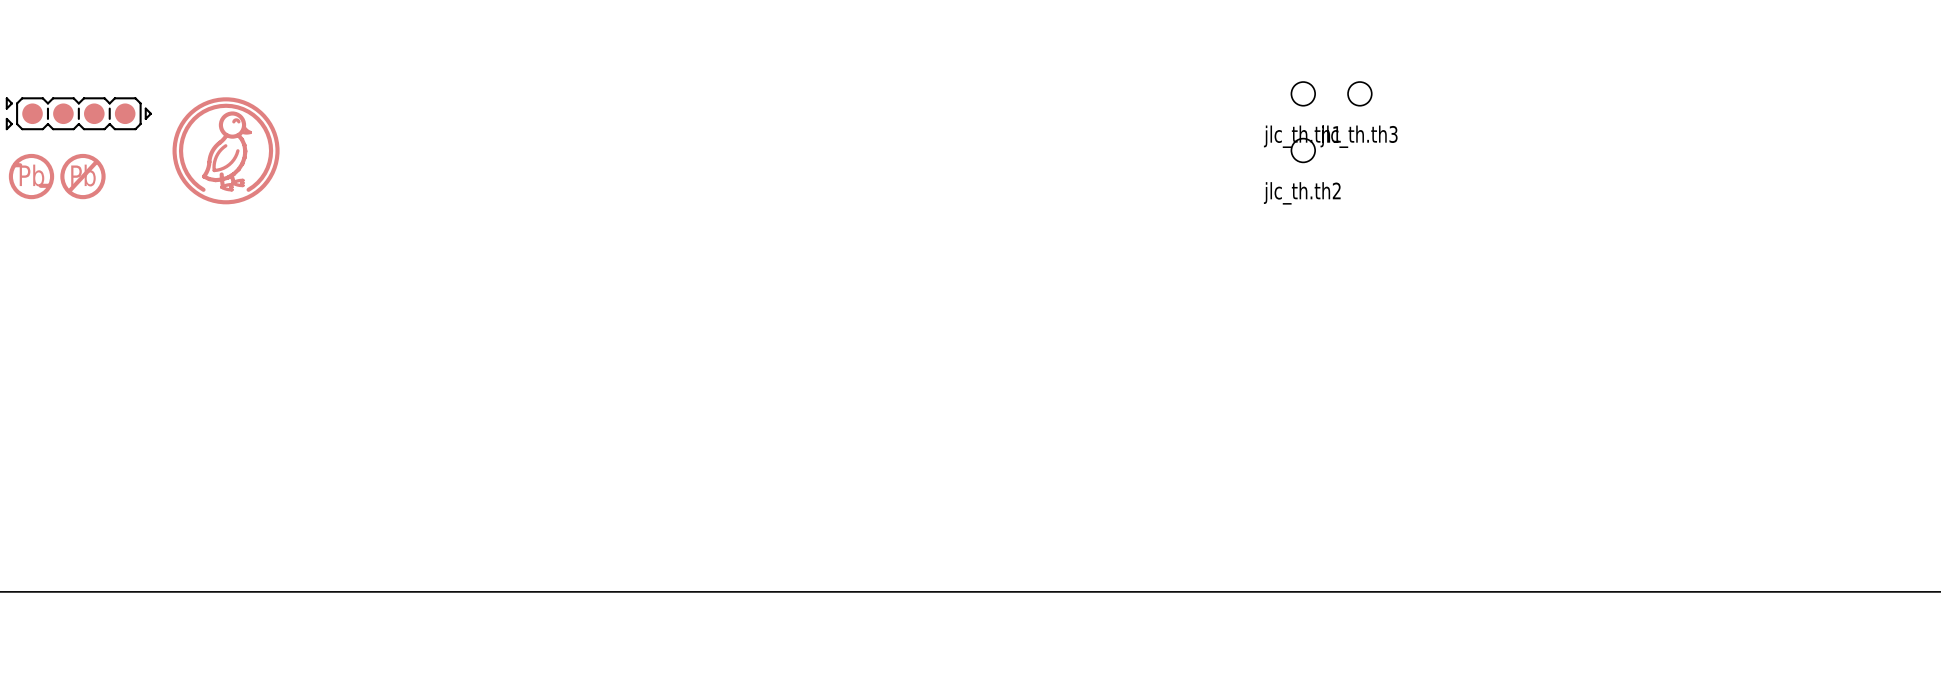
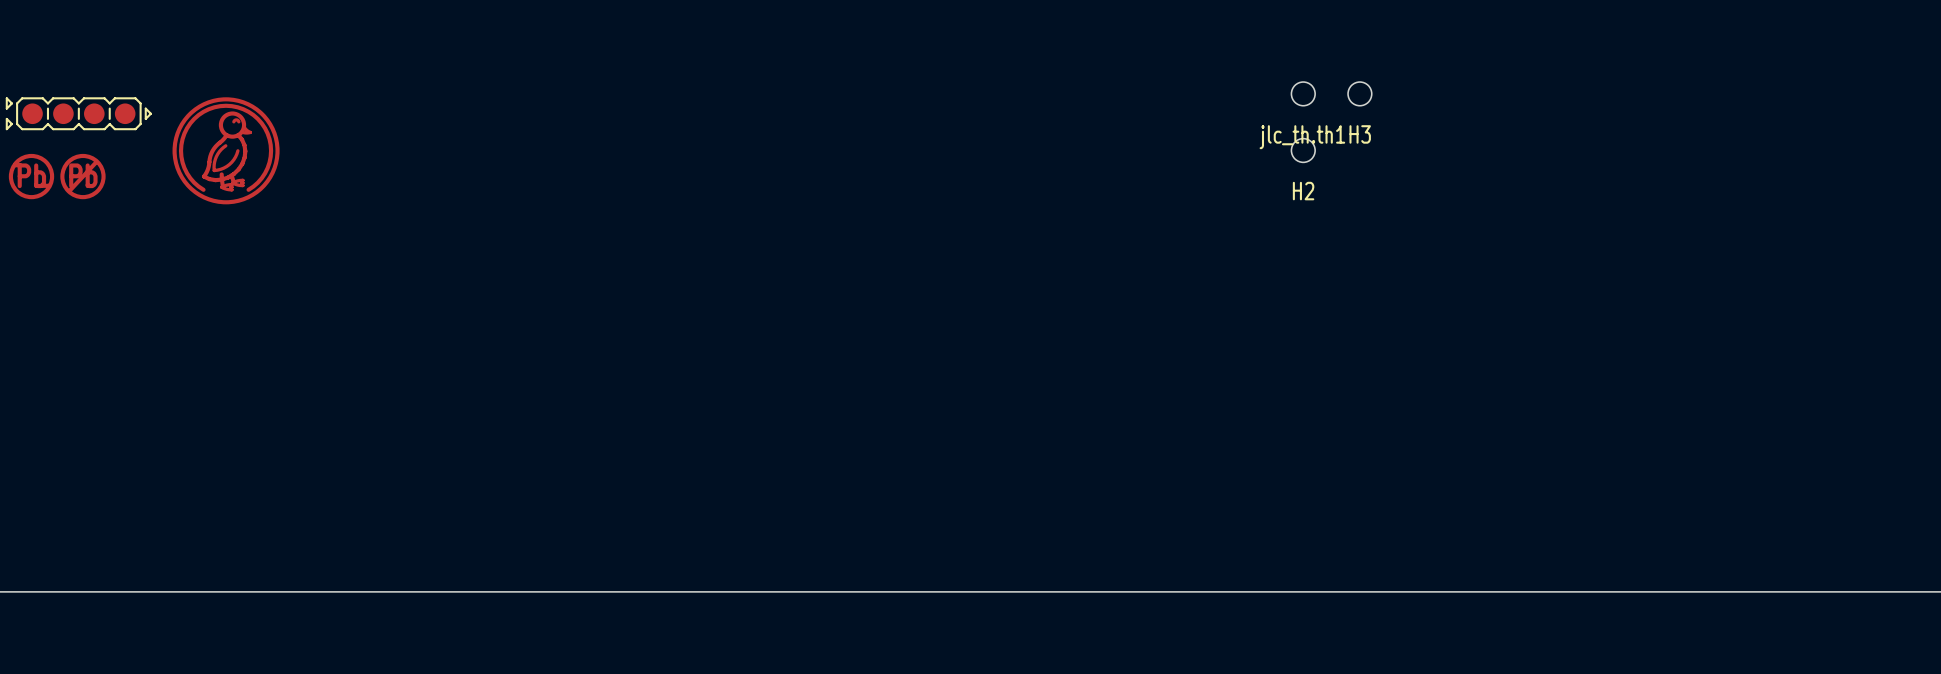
jlc_th.th3 name: jlc_th.th3 (1359, 136) -> H3 (1360, 134)
jlc_th.th2 name: jlc_th.th2 (1302, 193) -> H2 (1303, 191)

